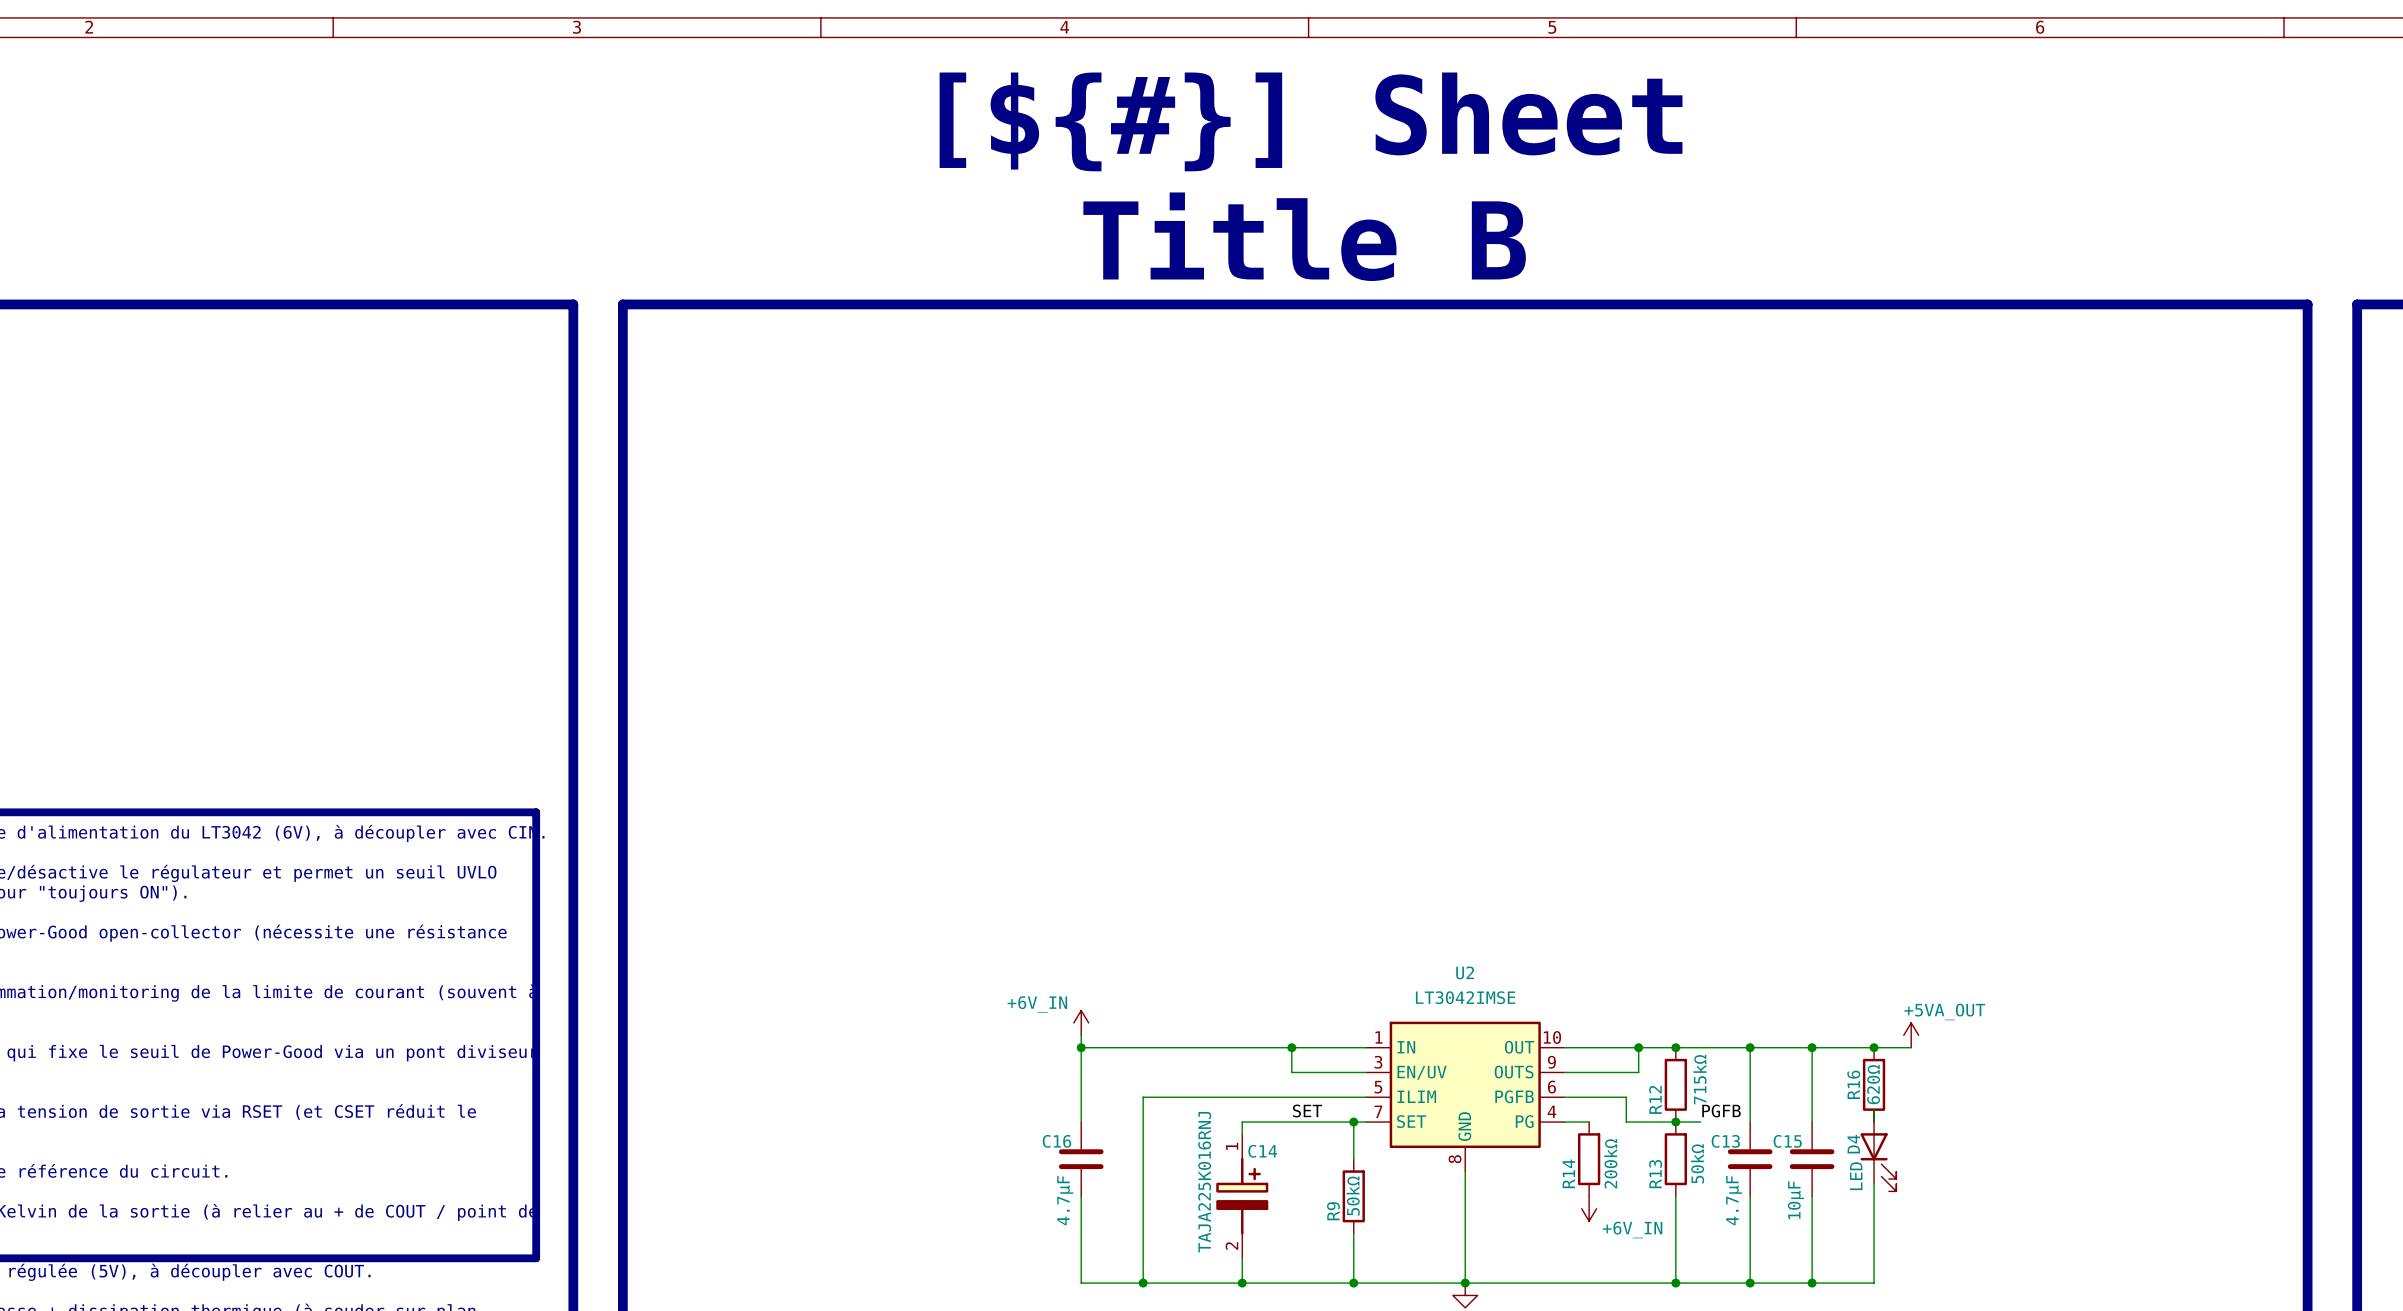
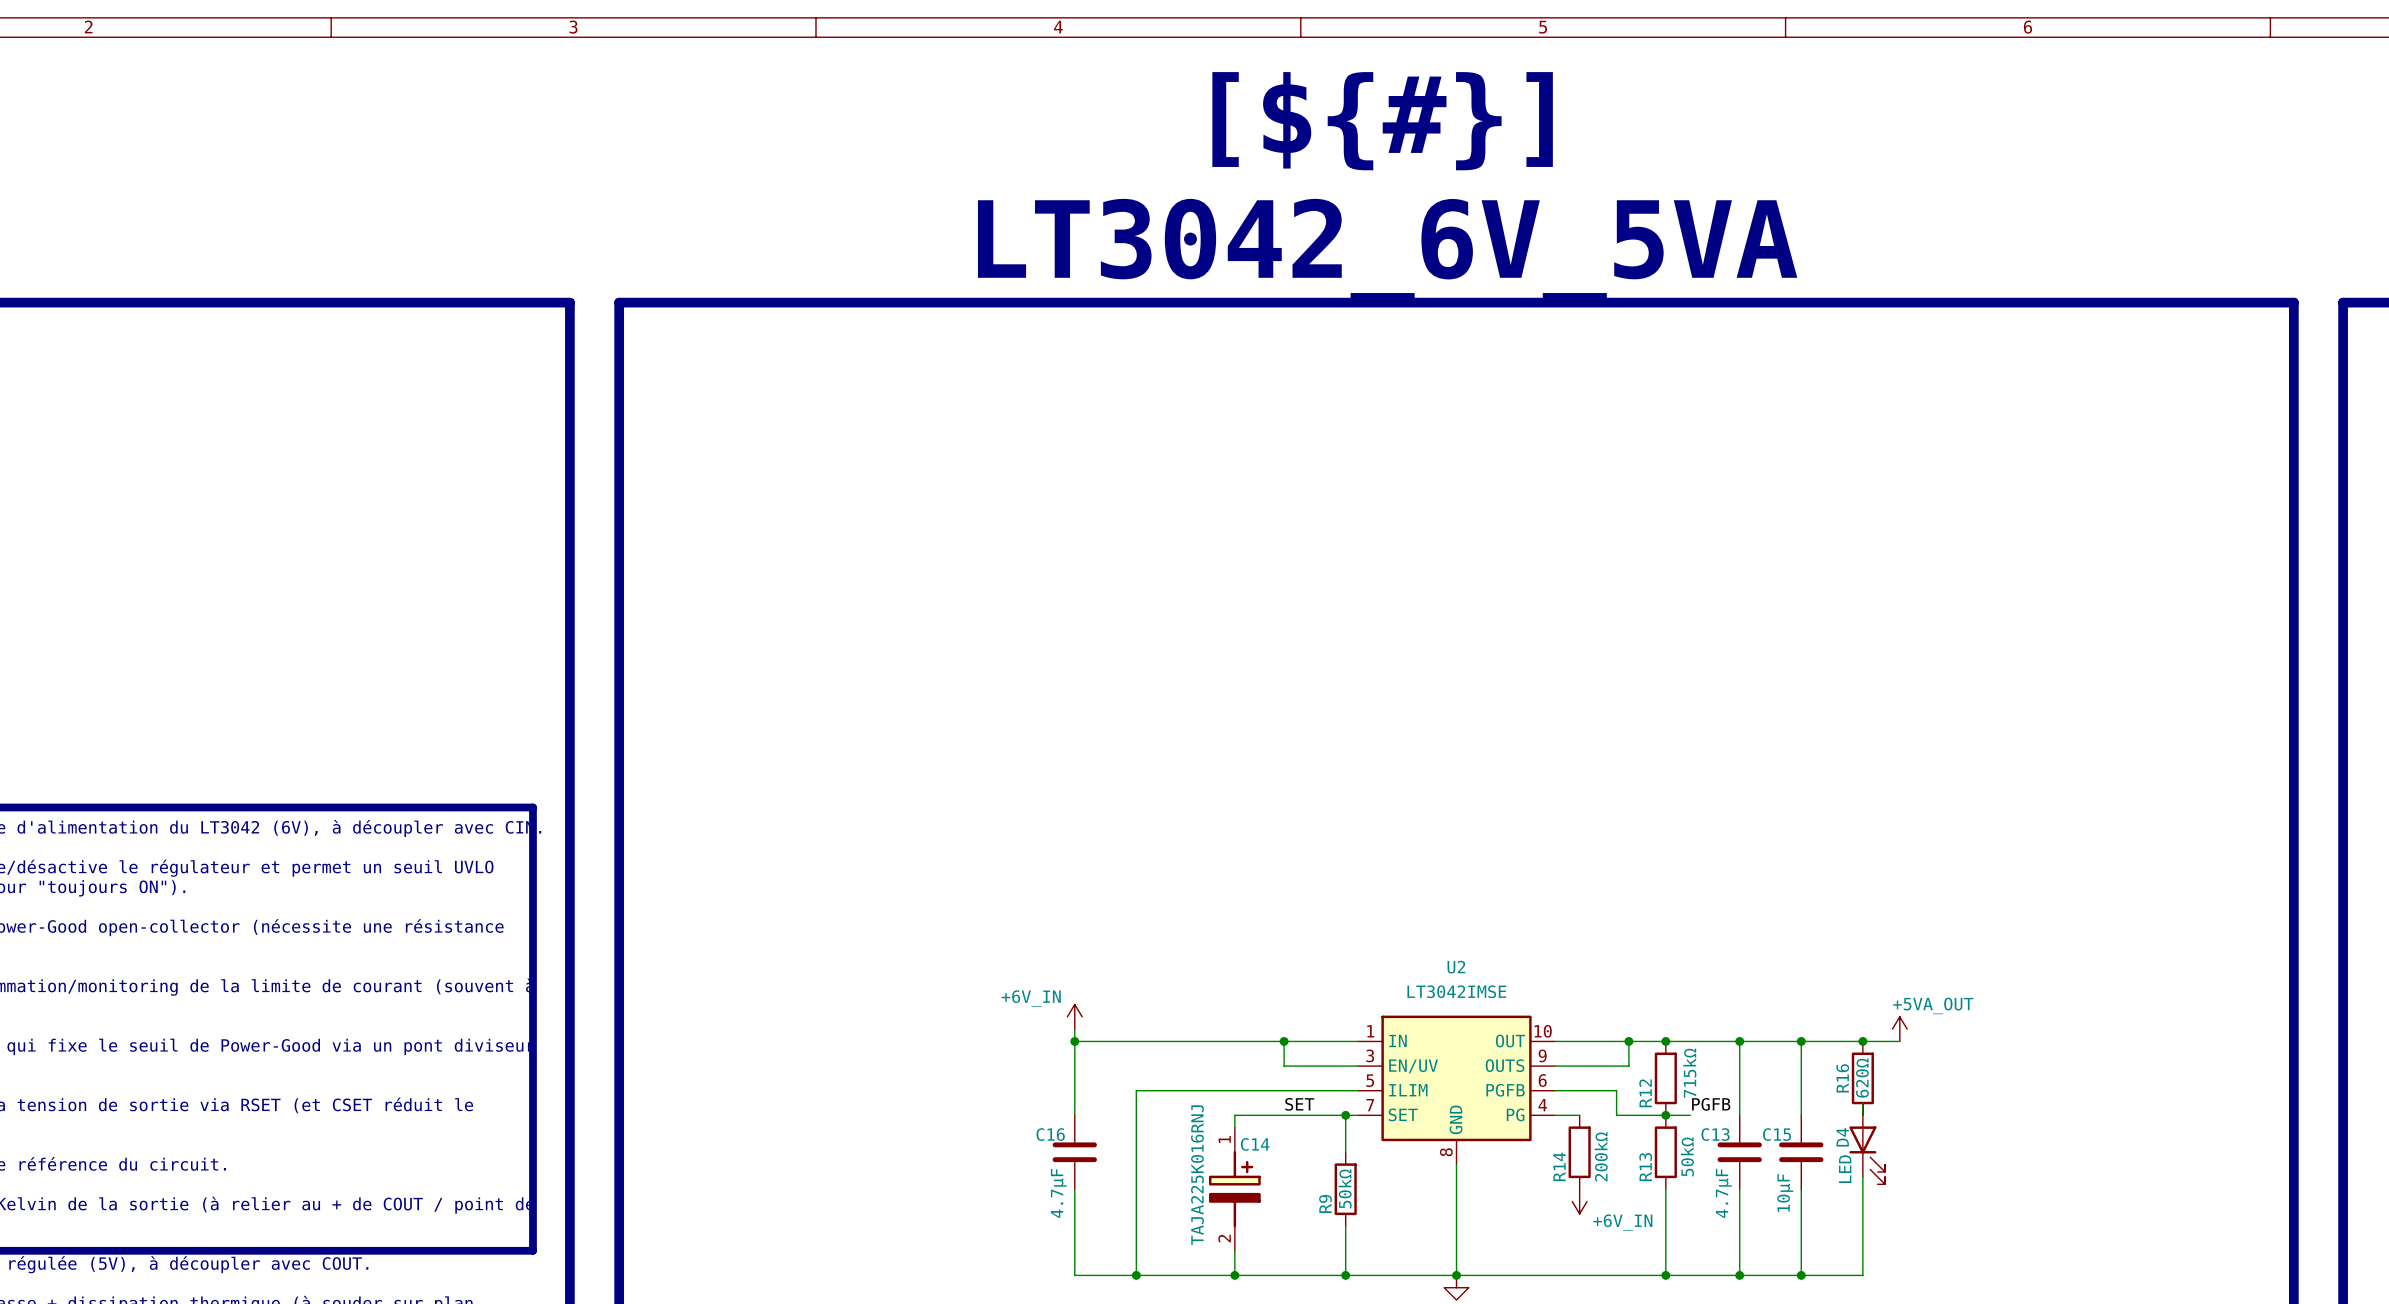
text: [${#}] Sheet (1311, 121) -> [${#}] (1382, 121)
text: Title B (1304, 236) -> none
text: none -> LT3042_6V_5VA (1387, 250)

